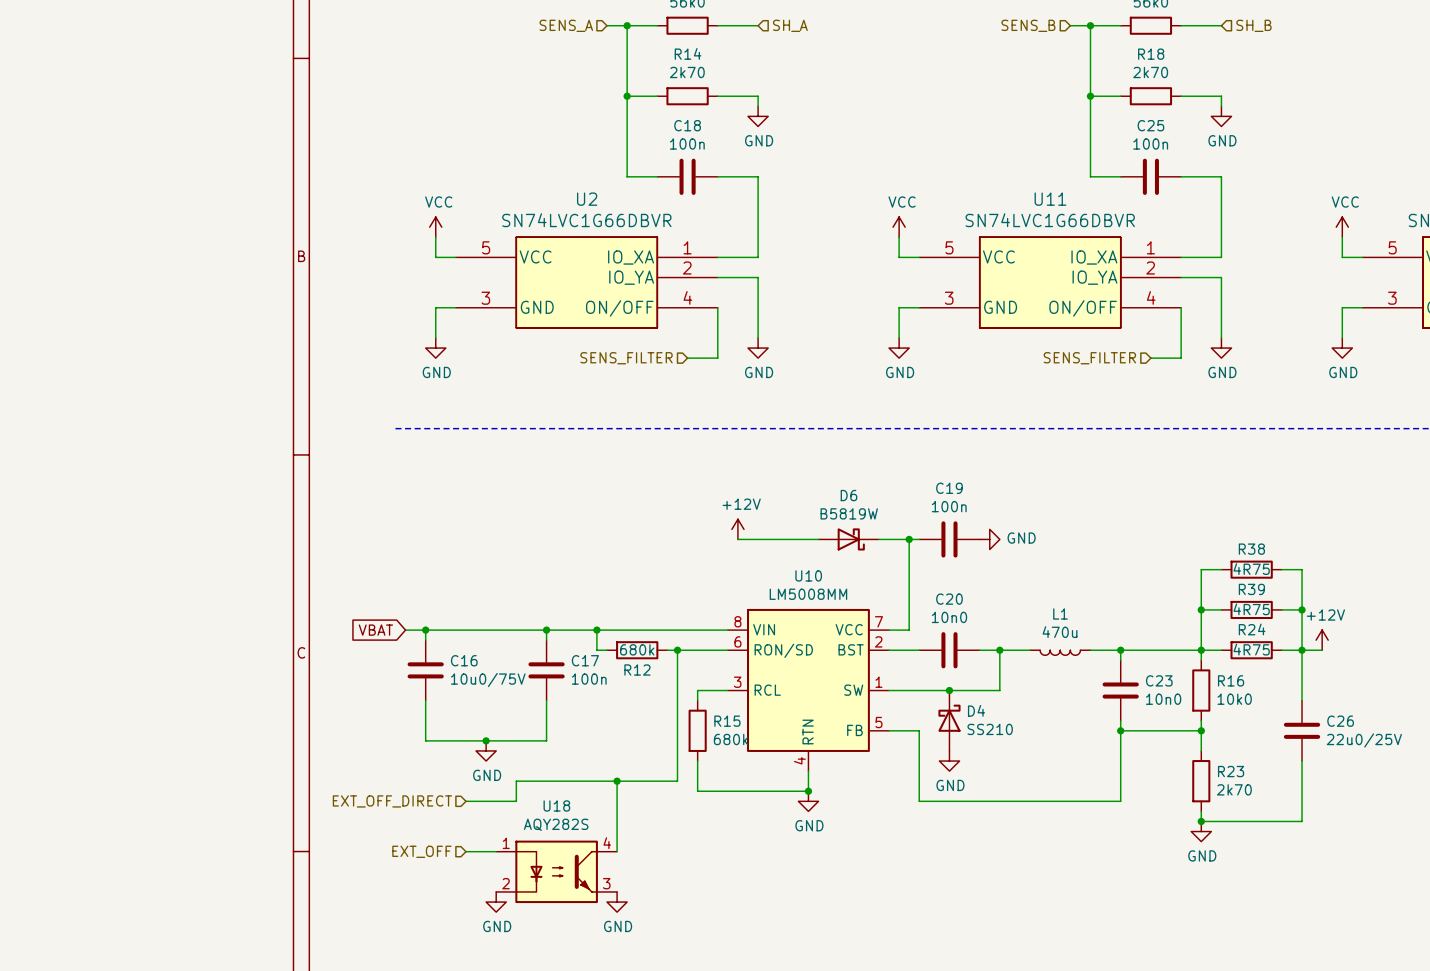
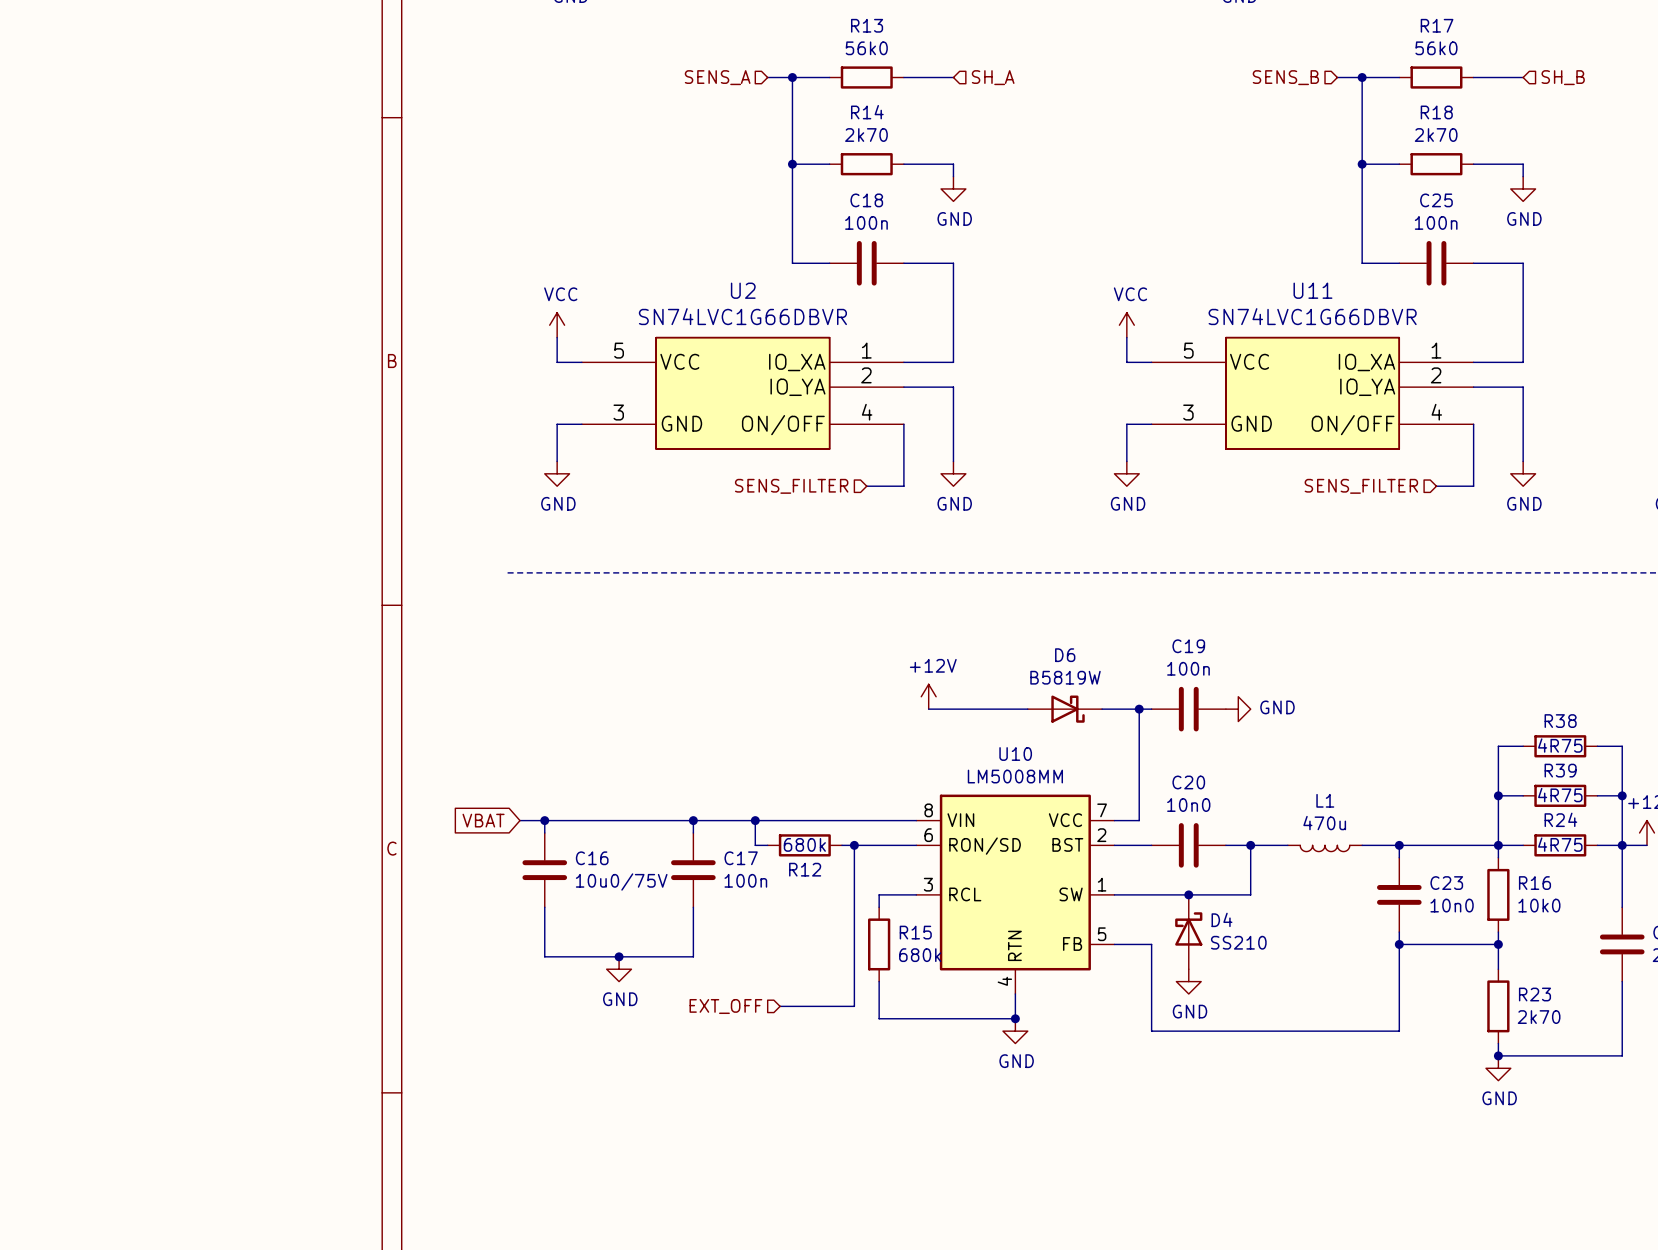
junction: (617, 781) -> none
hierarchical label: EXT_OFF_DIRECT (392, 801) -> none
wire: (465, 801) (516, 801) (516, 781) (617, 781) (617, 851) -> none
hierarchical label position: EXT_OFF (421, 851) -> EXT_OFF (725, 1006)
wire: (465, 851) (496, 851) -> none
U18: AQY282S (556, 871) -> none
power symbol: GND (496, 902) -> none
power symbol: GND (617, 902) -> none

